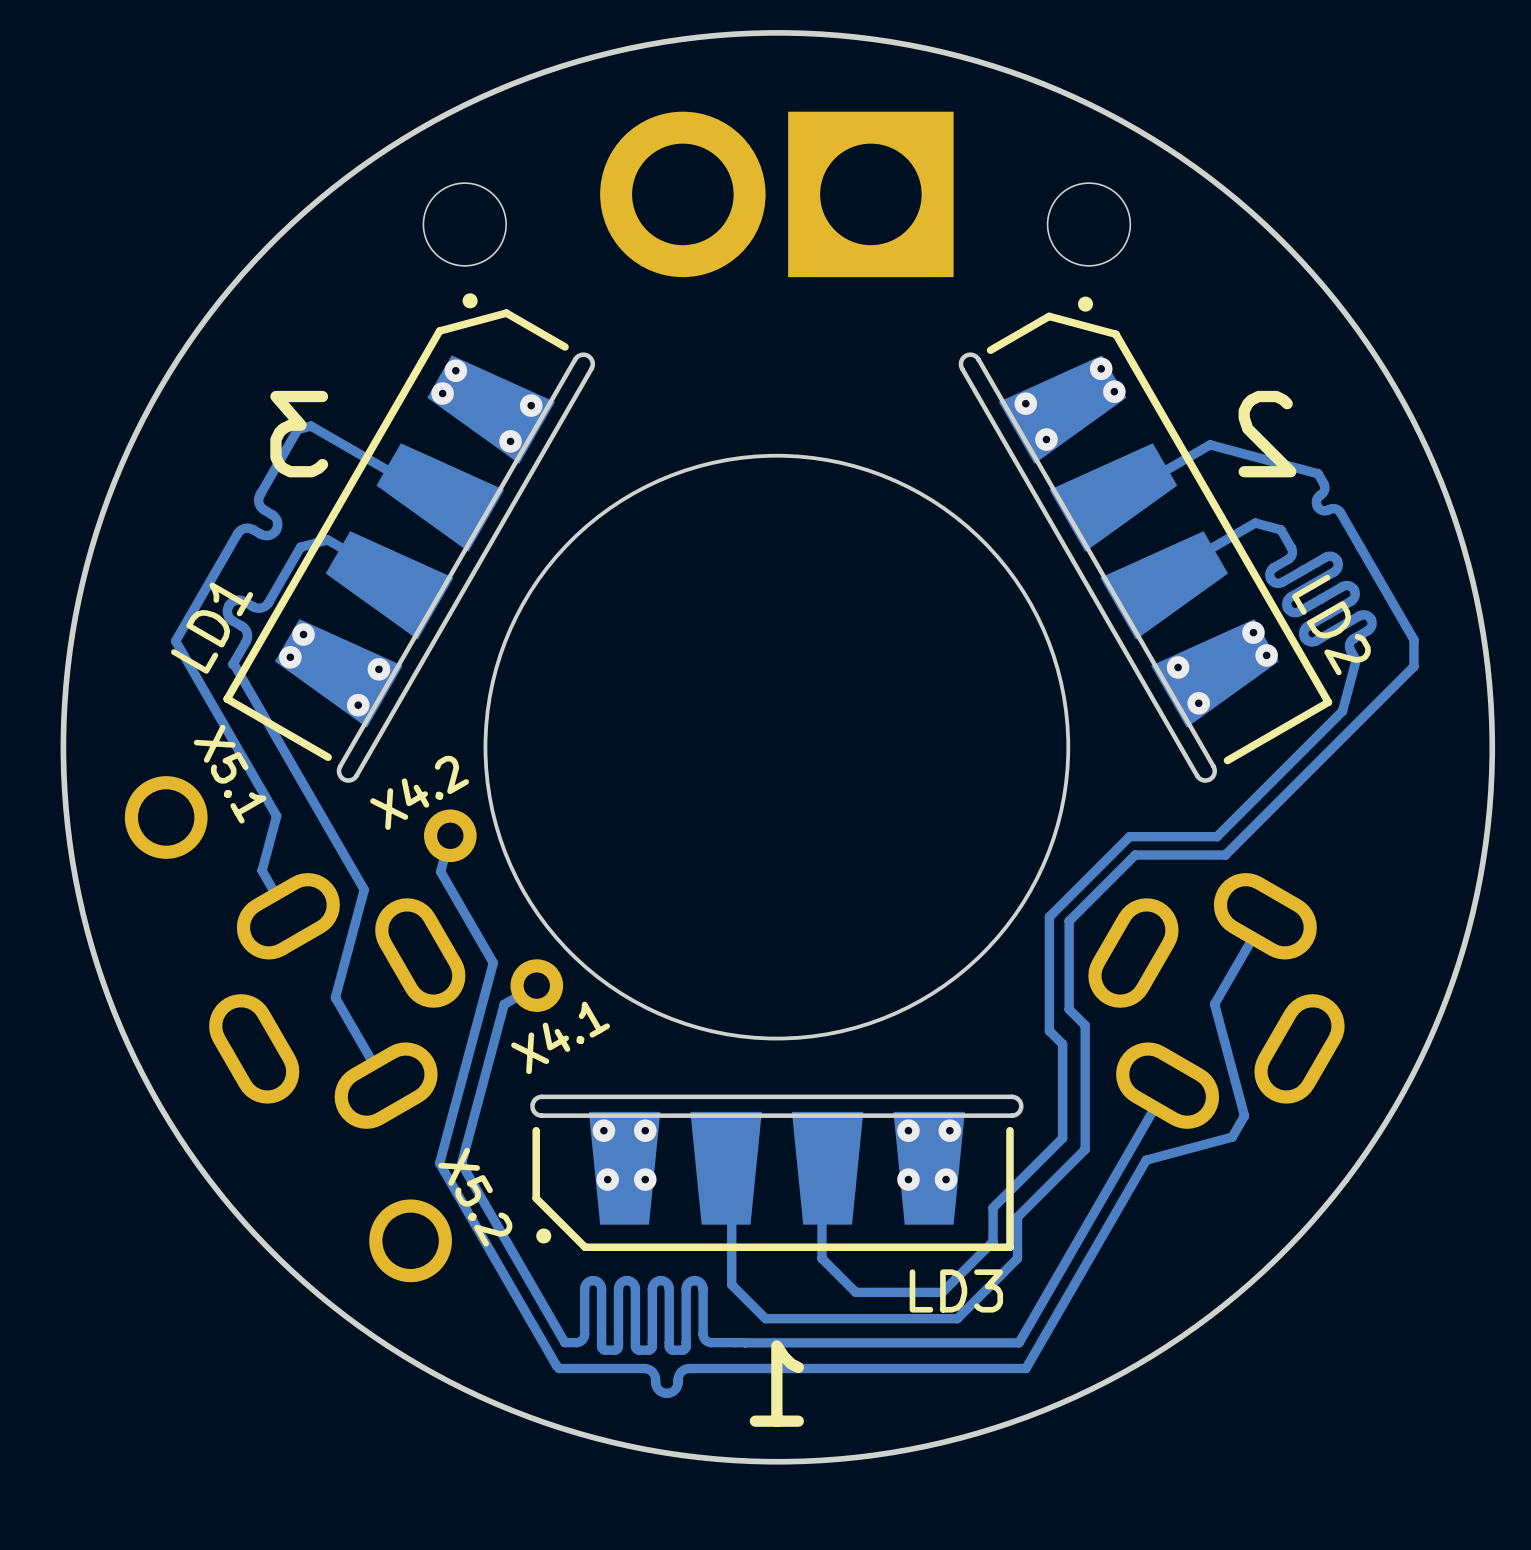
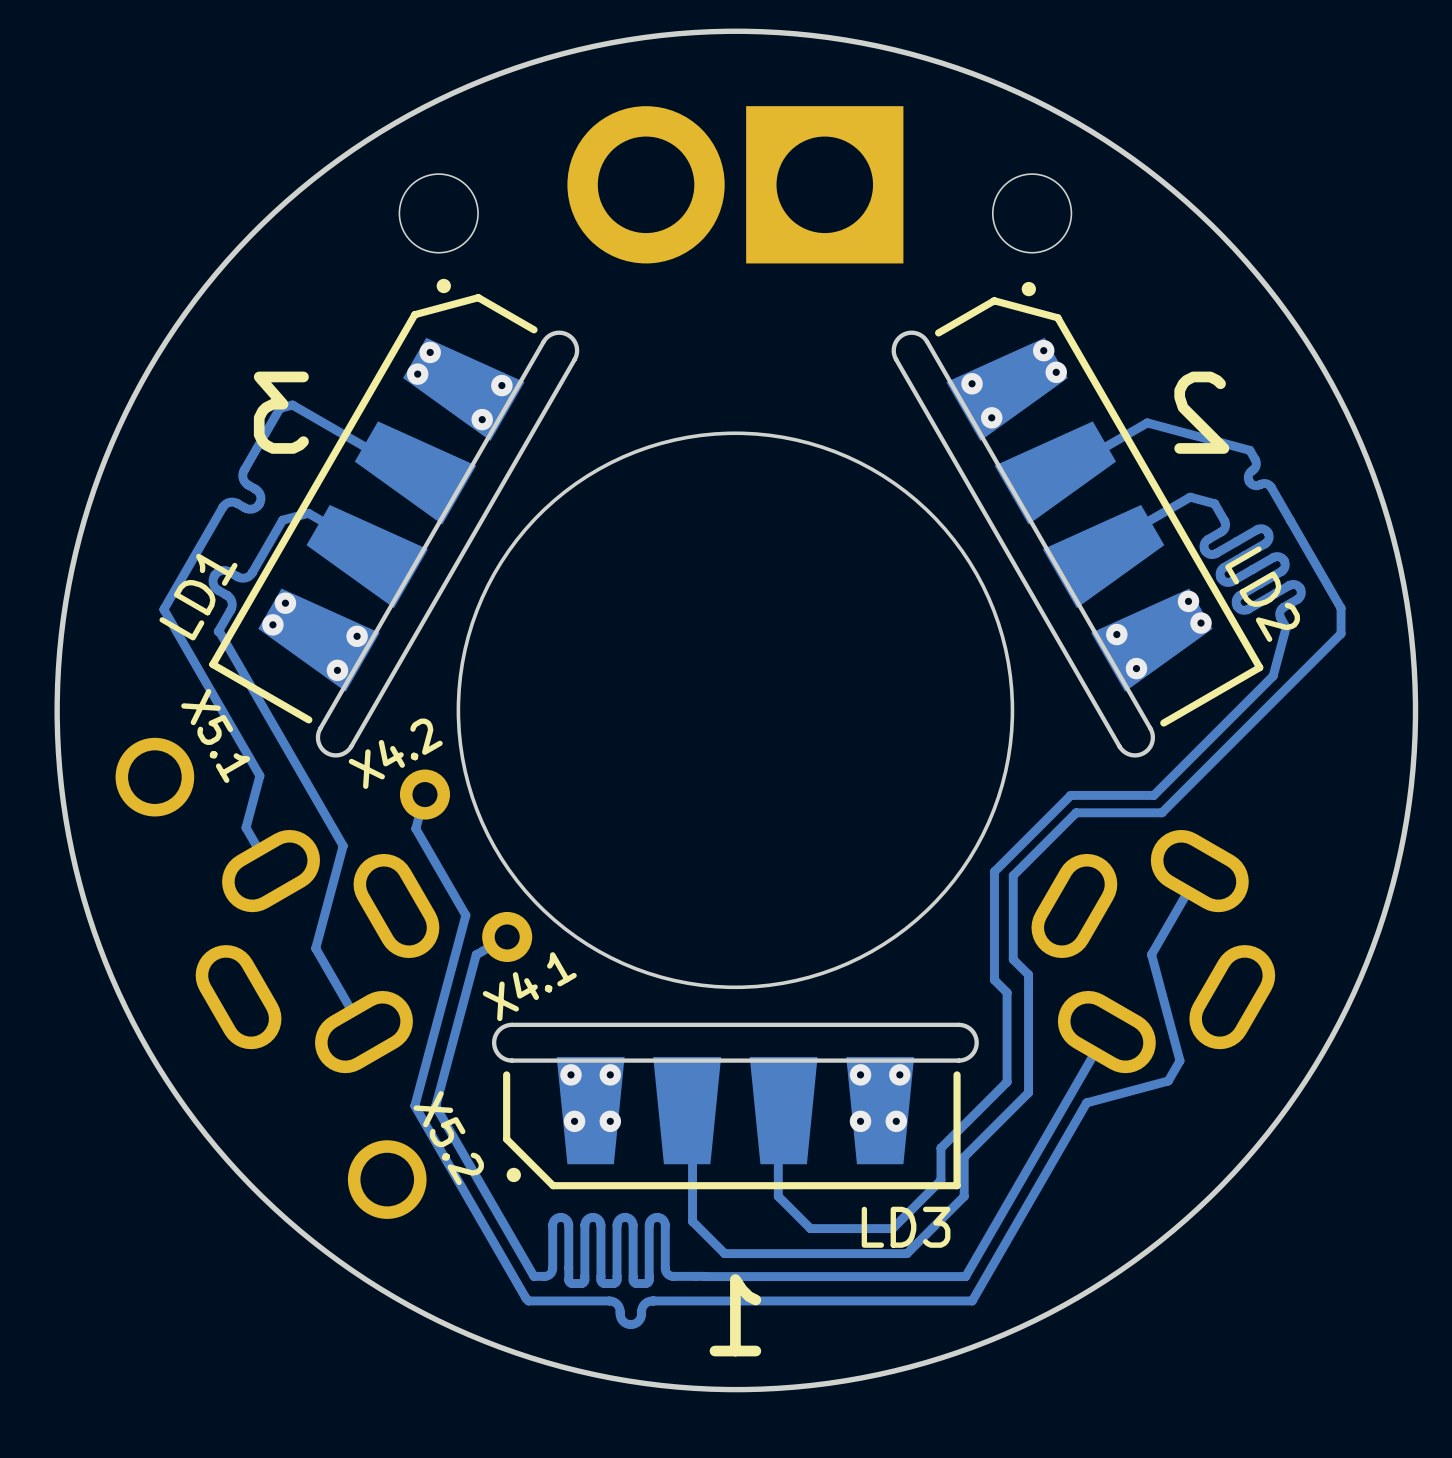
LD1 footprint: [223, 293, 596, 783] -> [209, 278, 580, 758]
LD2 footprint: [958, 296, 1333, 783] -> [891, 281, 1264, 758]
LD3 footprint: [530, 1094, 1024, 1252] -> [491, 1022, 979, 1190]

